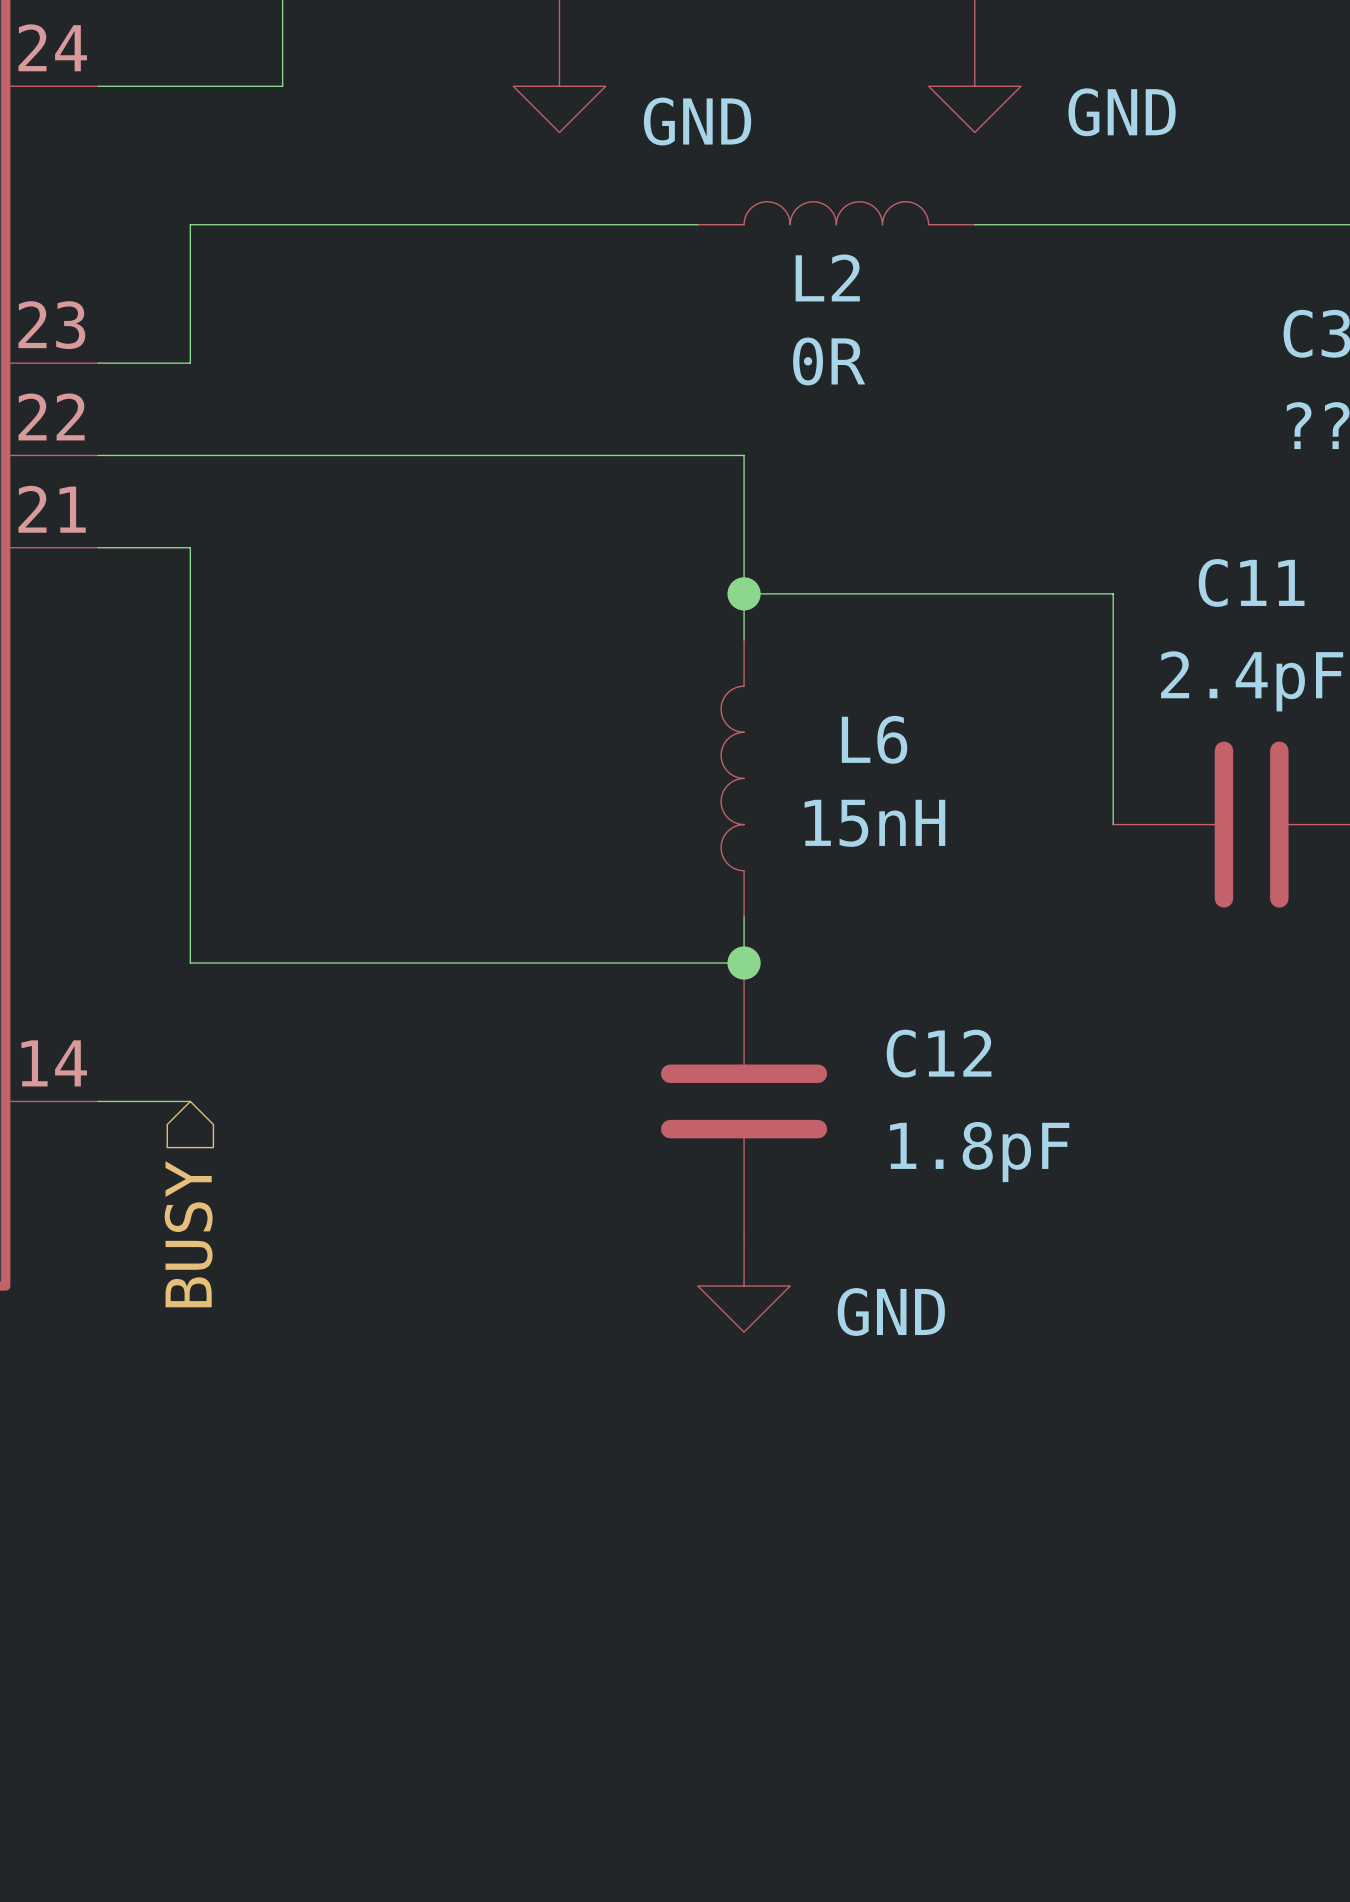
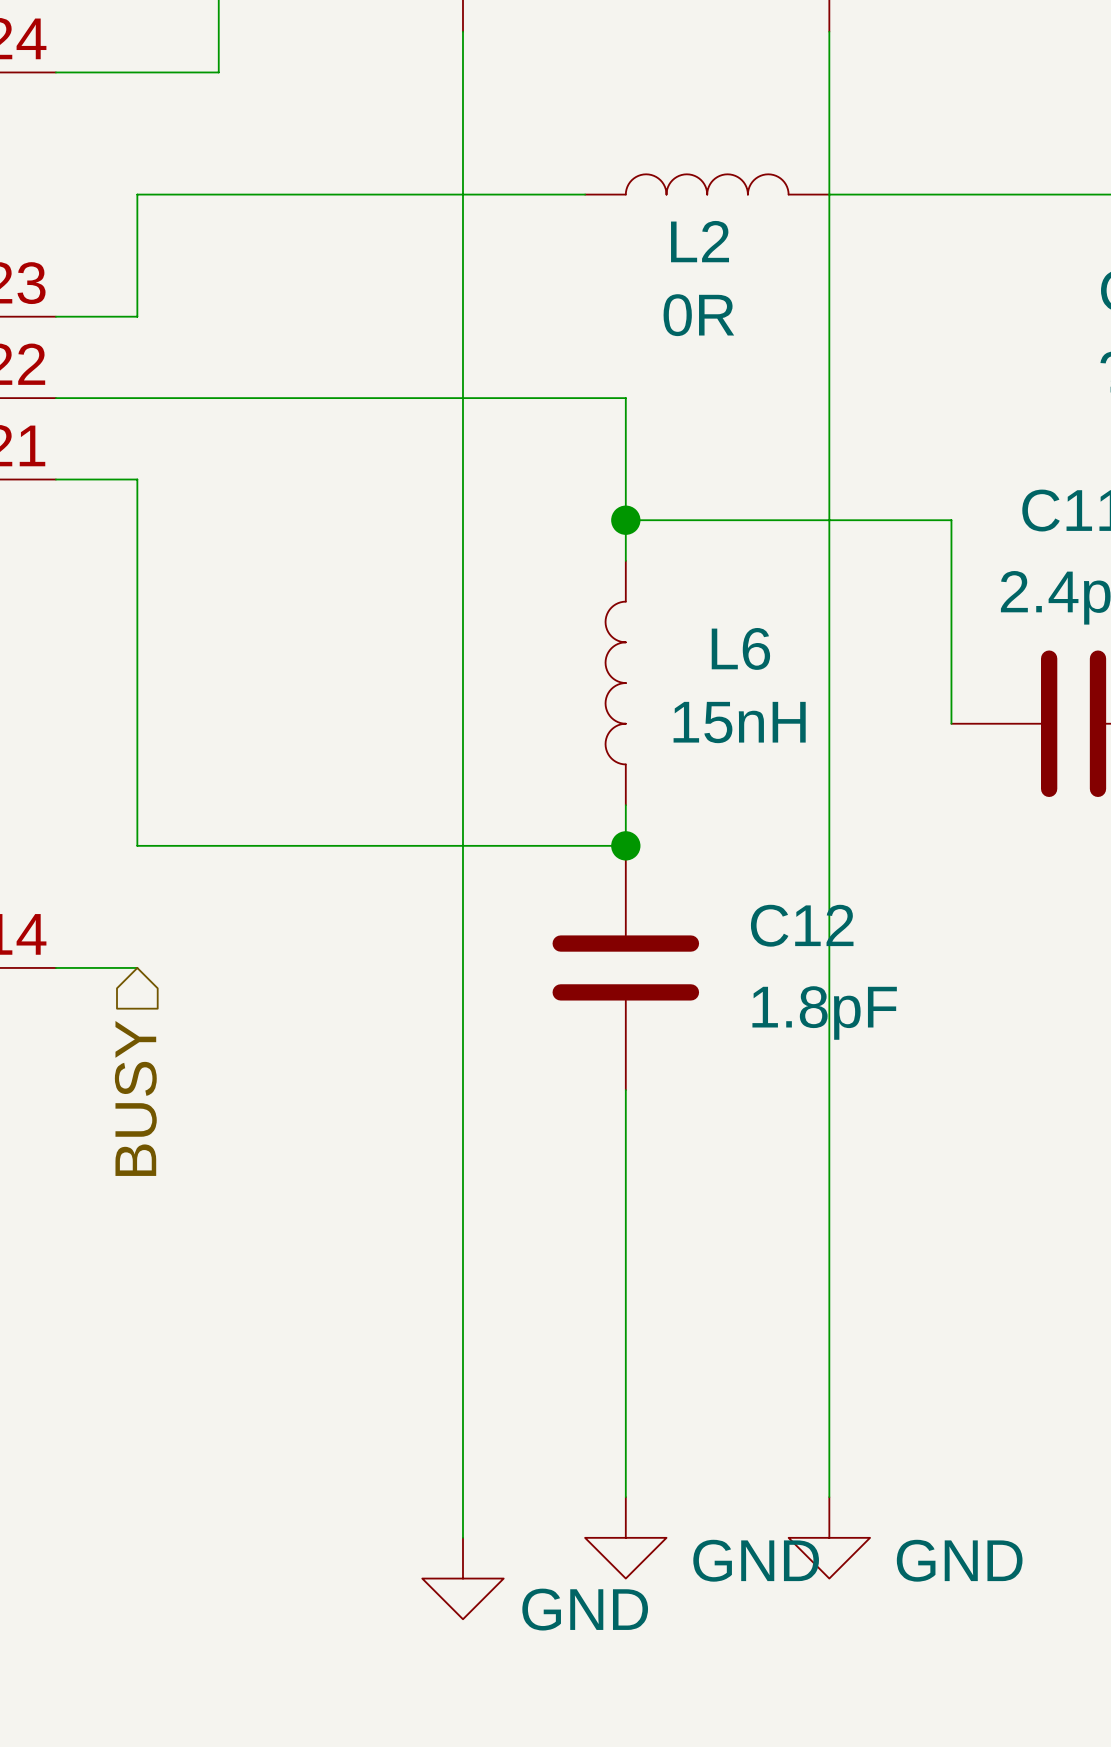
wire: none -> (462, 31) (462, 1537)
wire: none -> (829, 31) (829, 1497)
power symbol: GND (559, 86) -> none
power symbol: GND (974, 86) -> none
wire: none -> (625, 1090) (625, 1497)
power symbol: GND (744, 1286) -> none
power symbol: none -> GND (625, 1537)
power symbol: none -> GND (829, 1537)
power symbol: none -> GND (462, 1578)

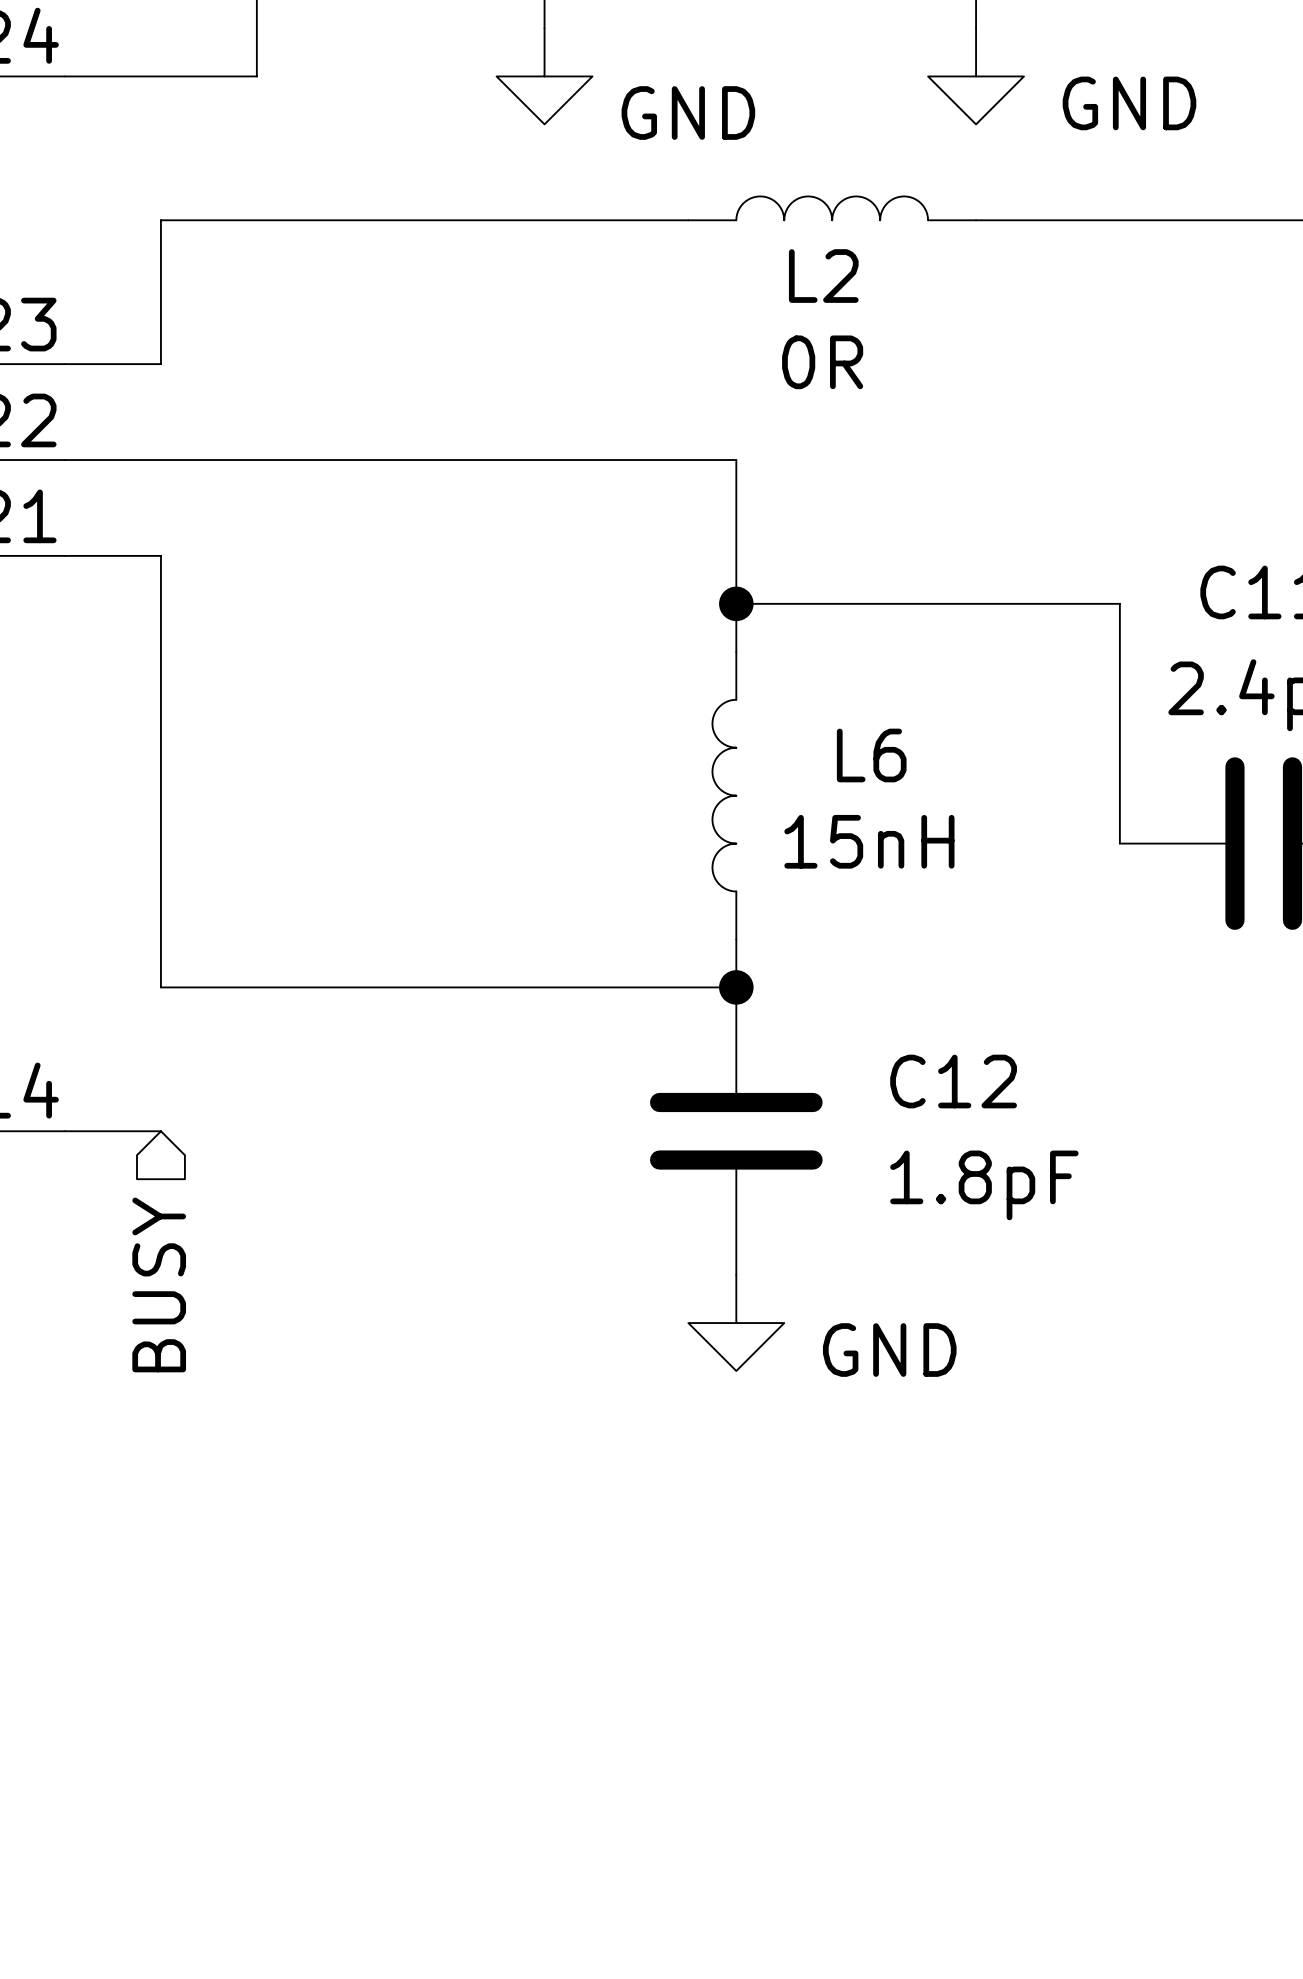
wire: (462, 31) (462, 1537) -> none
wire: (829, 31) (829, 1497) -> none
power symbol: none -> GND (544, 76)
power symbol: none -> GND (976, 76)
wire: (625, 1090) (625, 1497) -> none
power symbol: none -> GND (736, 1323)
power symbol: GND (625, 1537) -> none
power symbol: GND (829, 1537) -> none
power symbol: GND (462, 1578) -> none

